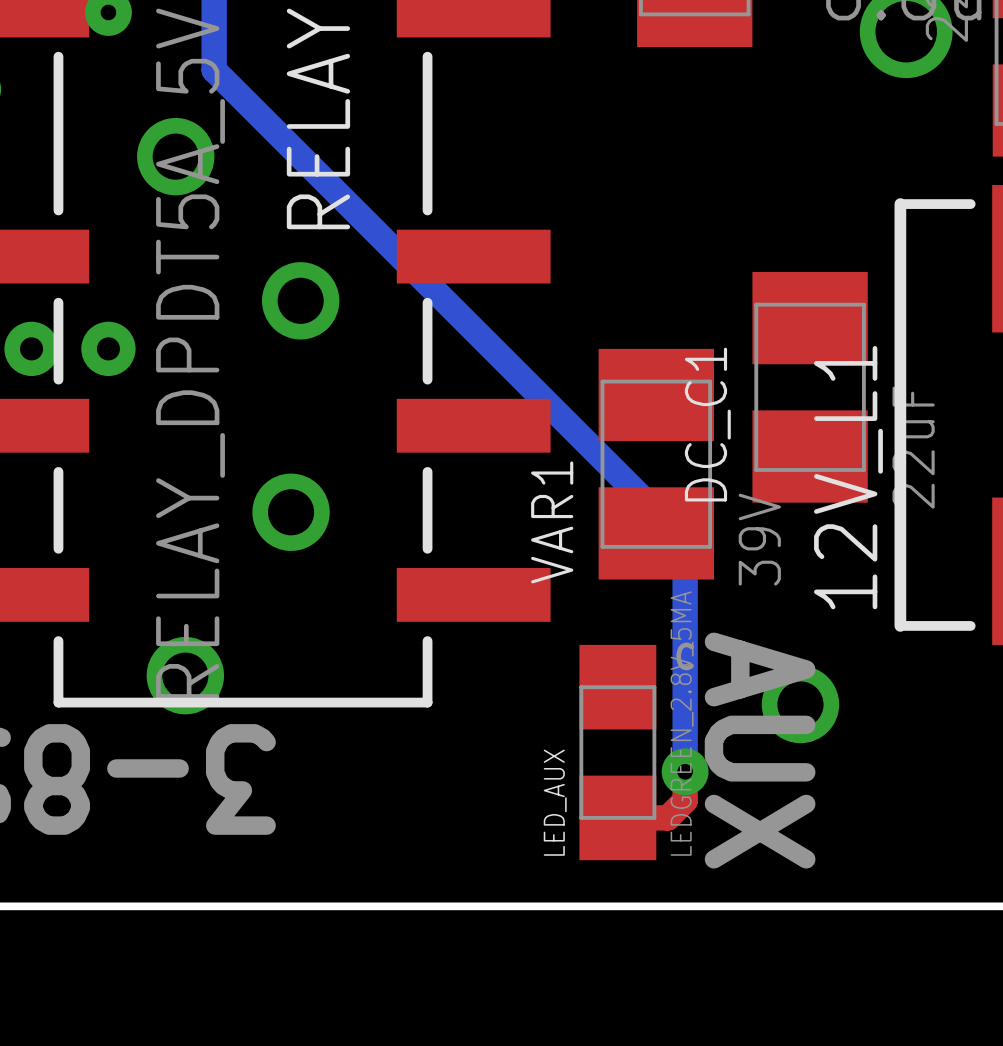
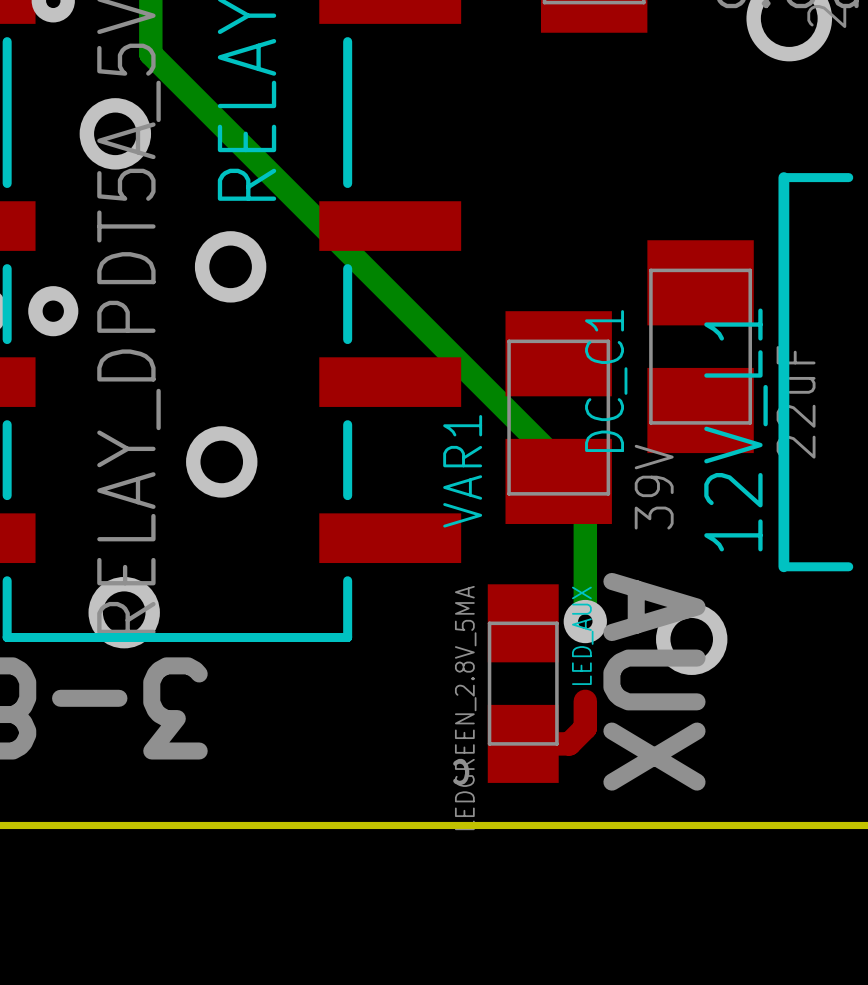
bottom track: (685, 685) (685, 771) -> none
LED_AUX rotation: 0° (617, 752) -> 180° (523, 683)
via position: (685, 771) -> (585, 621)

